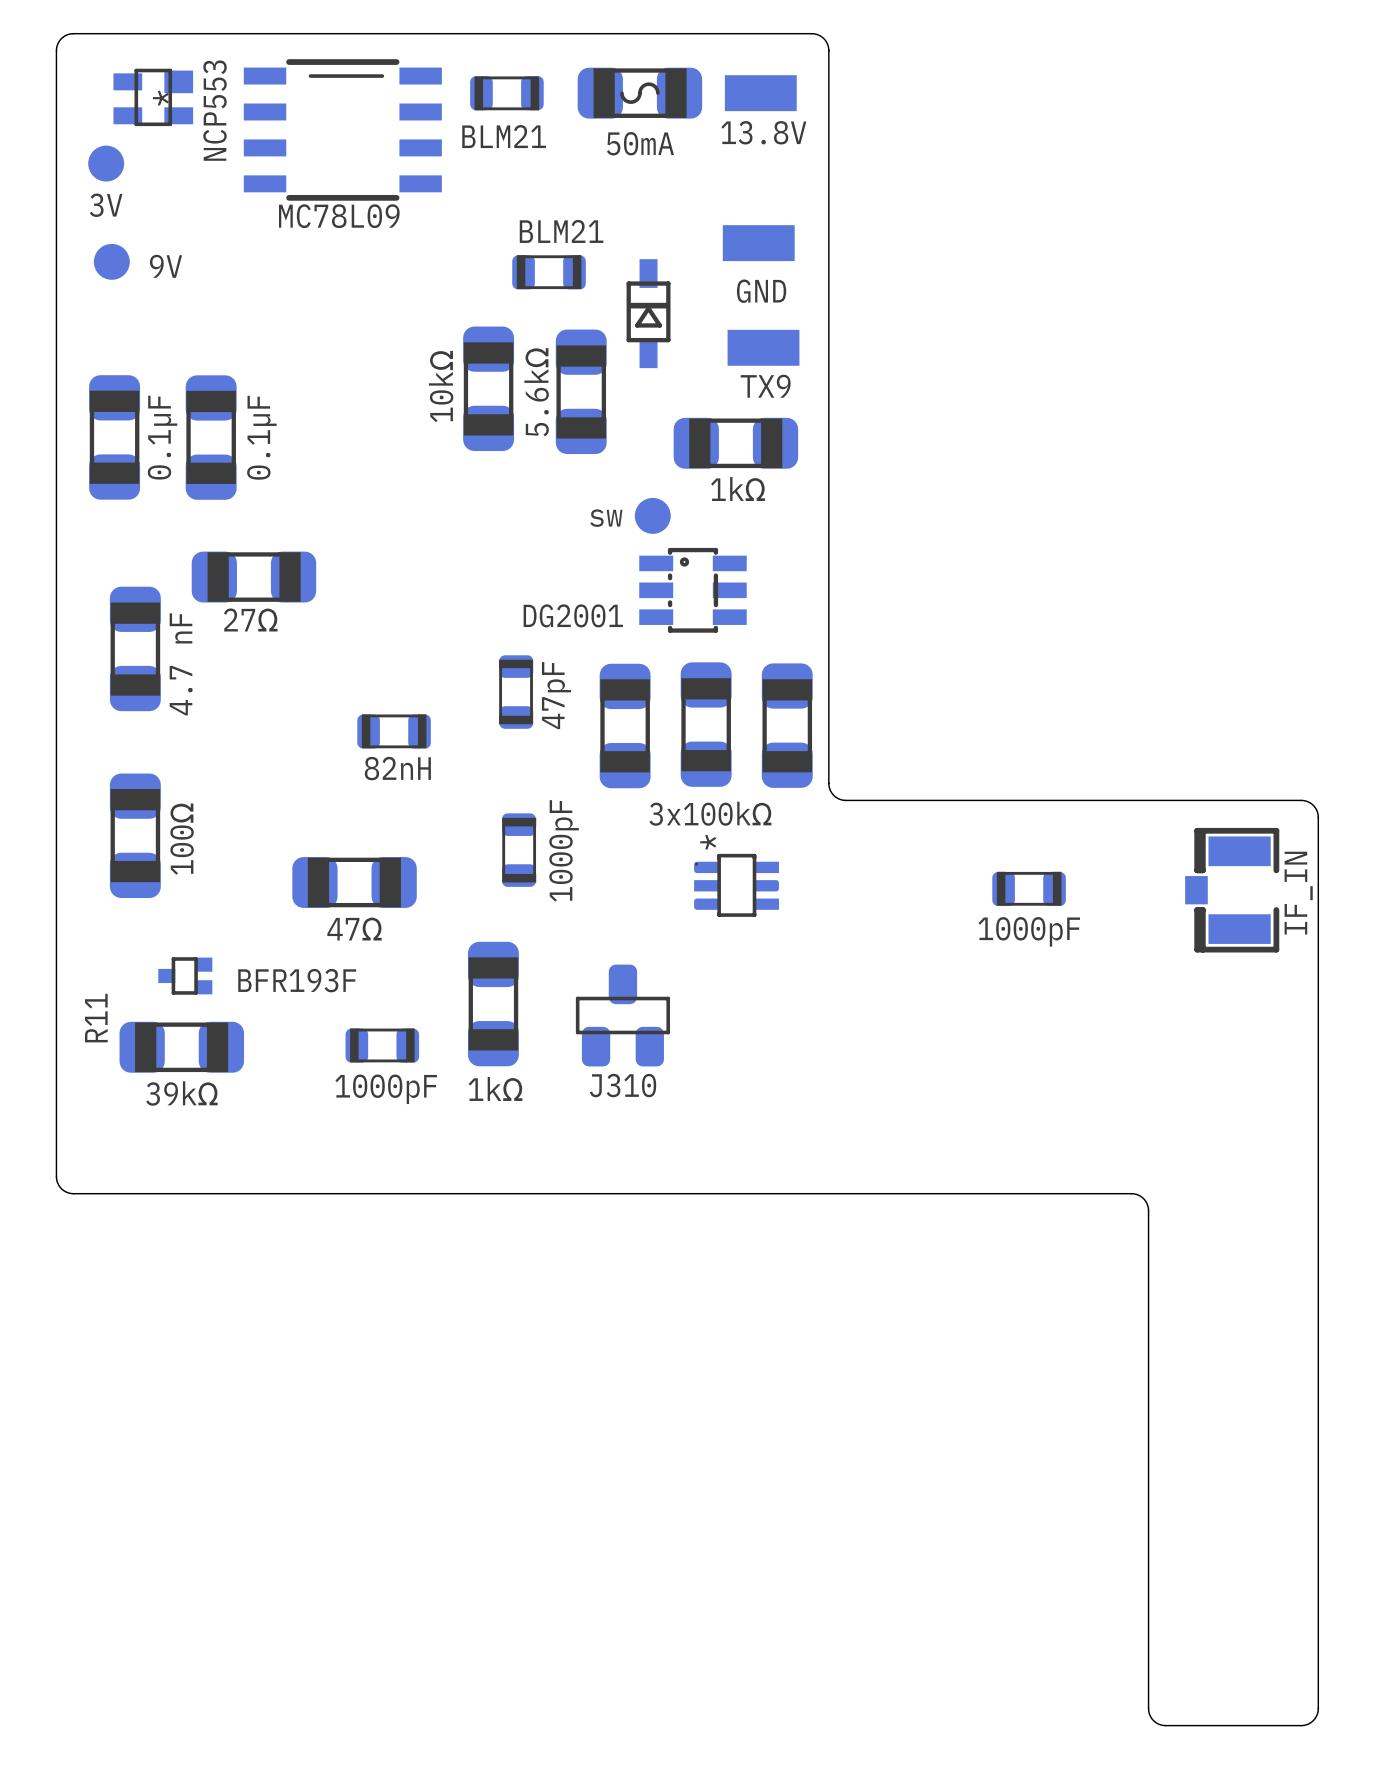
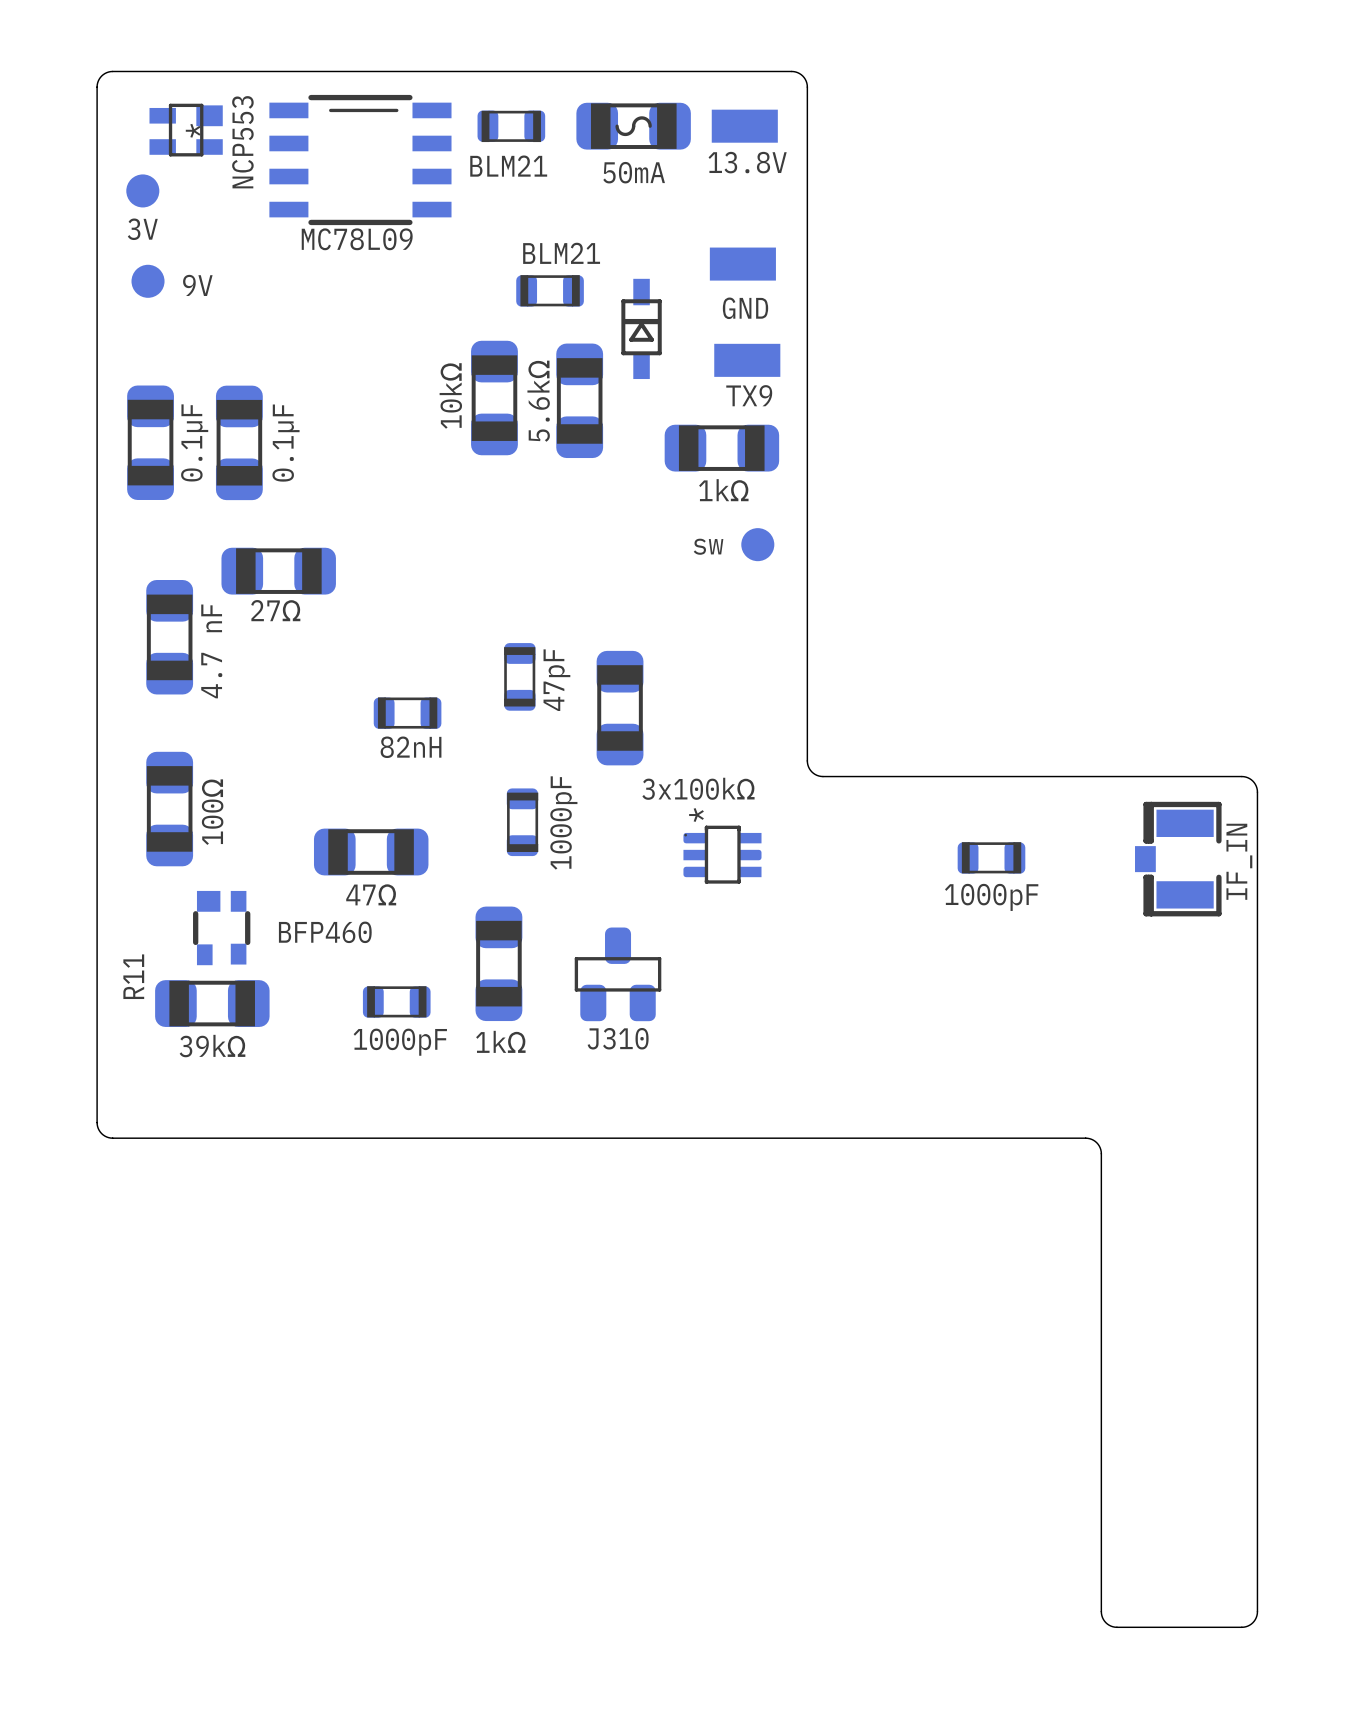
part position: (652, 515) -> (757, 544)
text position: sw (606, 518) -> sw (708, 546)
part: DG2001 (692, 590) -> none
part: (706, 724) -> none
part: (787, 725) -> none
part footprint: [158, 957, 213, 995] -> [193, 890, 251, 966]
part value: BFR193F (297, 980) -> BFP460 (325, 932)

